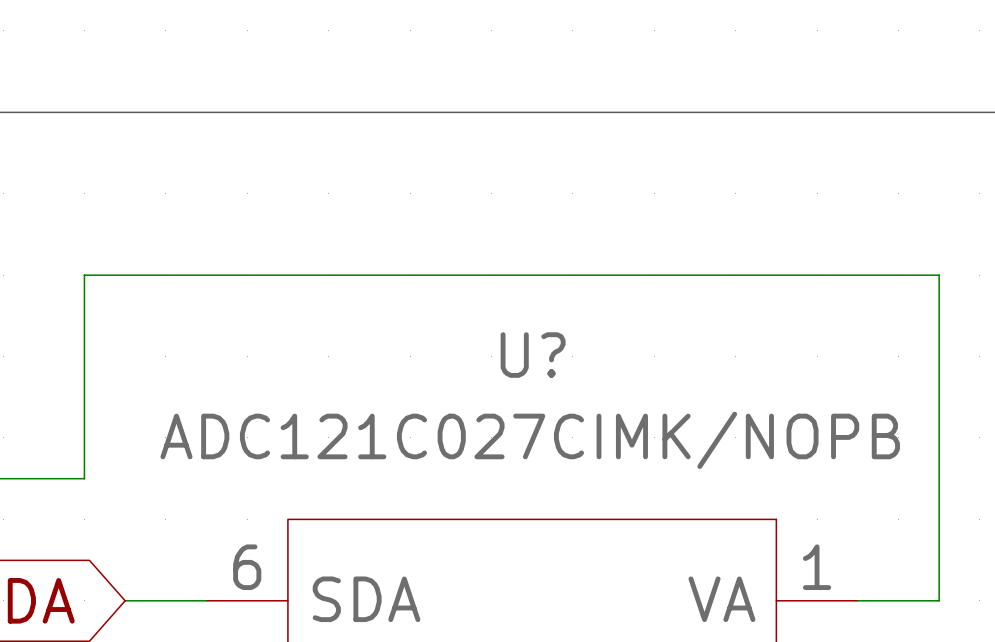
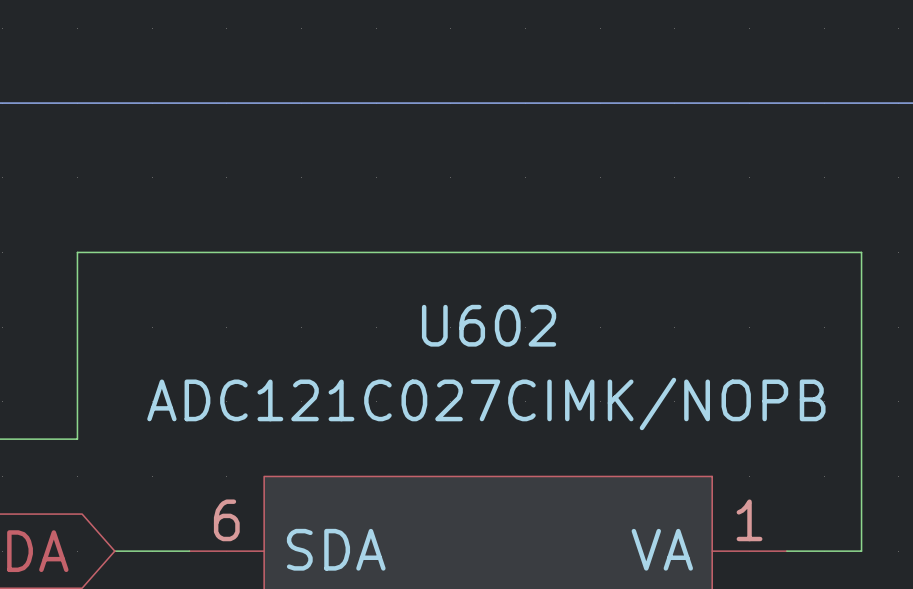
U? name: U? (533, 355) -> U602 (489, 325)

